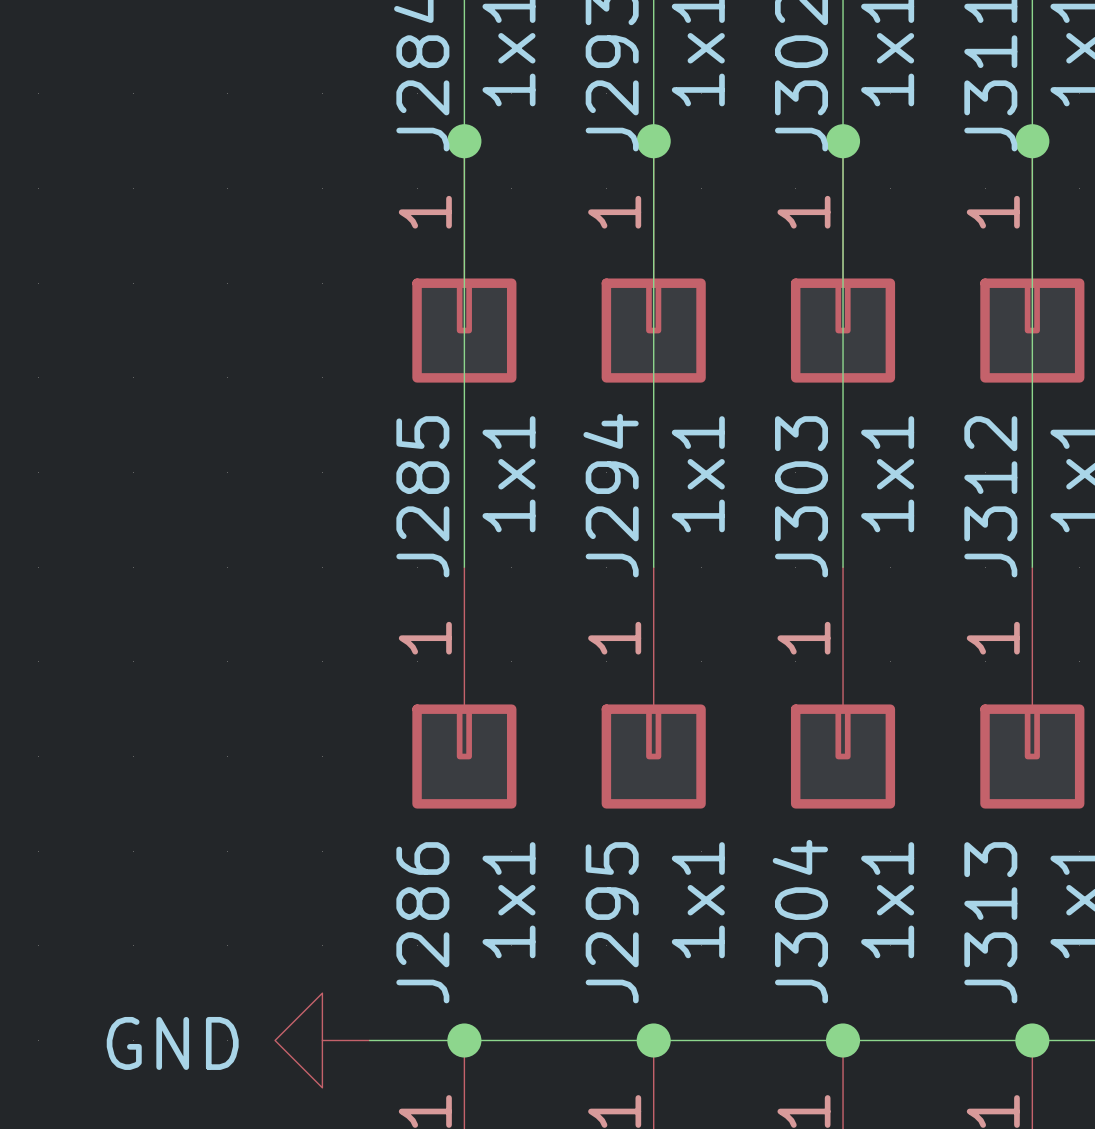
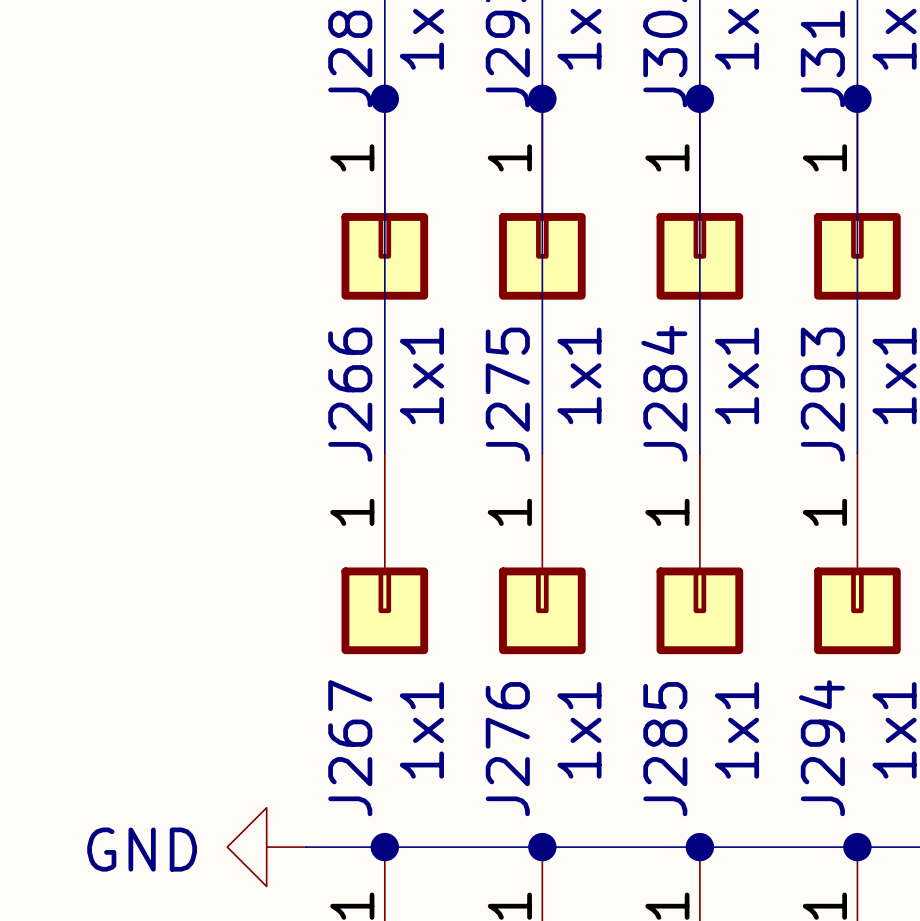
J294 name: J294 (611, 495) -> J275 (507, 394)
J285 name: J285 (422, 496) -> J266 (350, 394)
J303 name: J303 (801, 496) -> J284 (664, 393)
J312 name: J312 (990, 496) -> J293 (822, 394)
J304 name: J304 (800, 921) -> J285 (665, 749)
J286 name: J286 (422, 922) -> J267 (350, 748)
J295 name: J295 (612, 922) -> J276 (507, 749)
J313 name: J313 (990, 922) -> J294 (821, 748)

